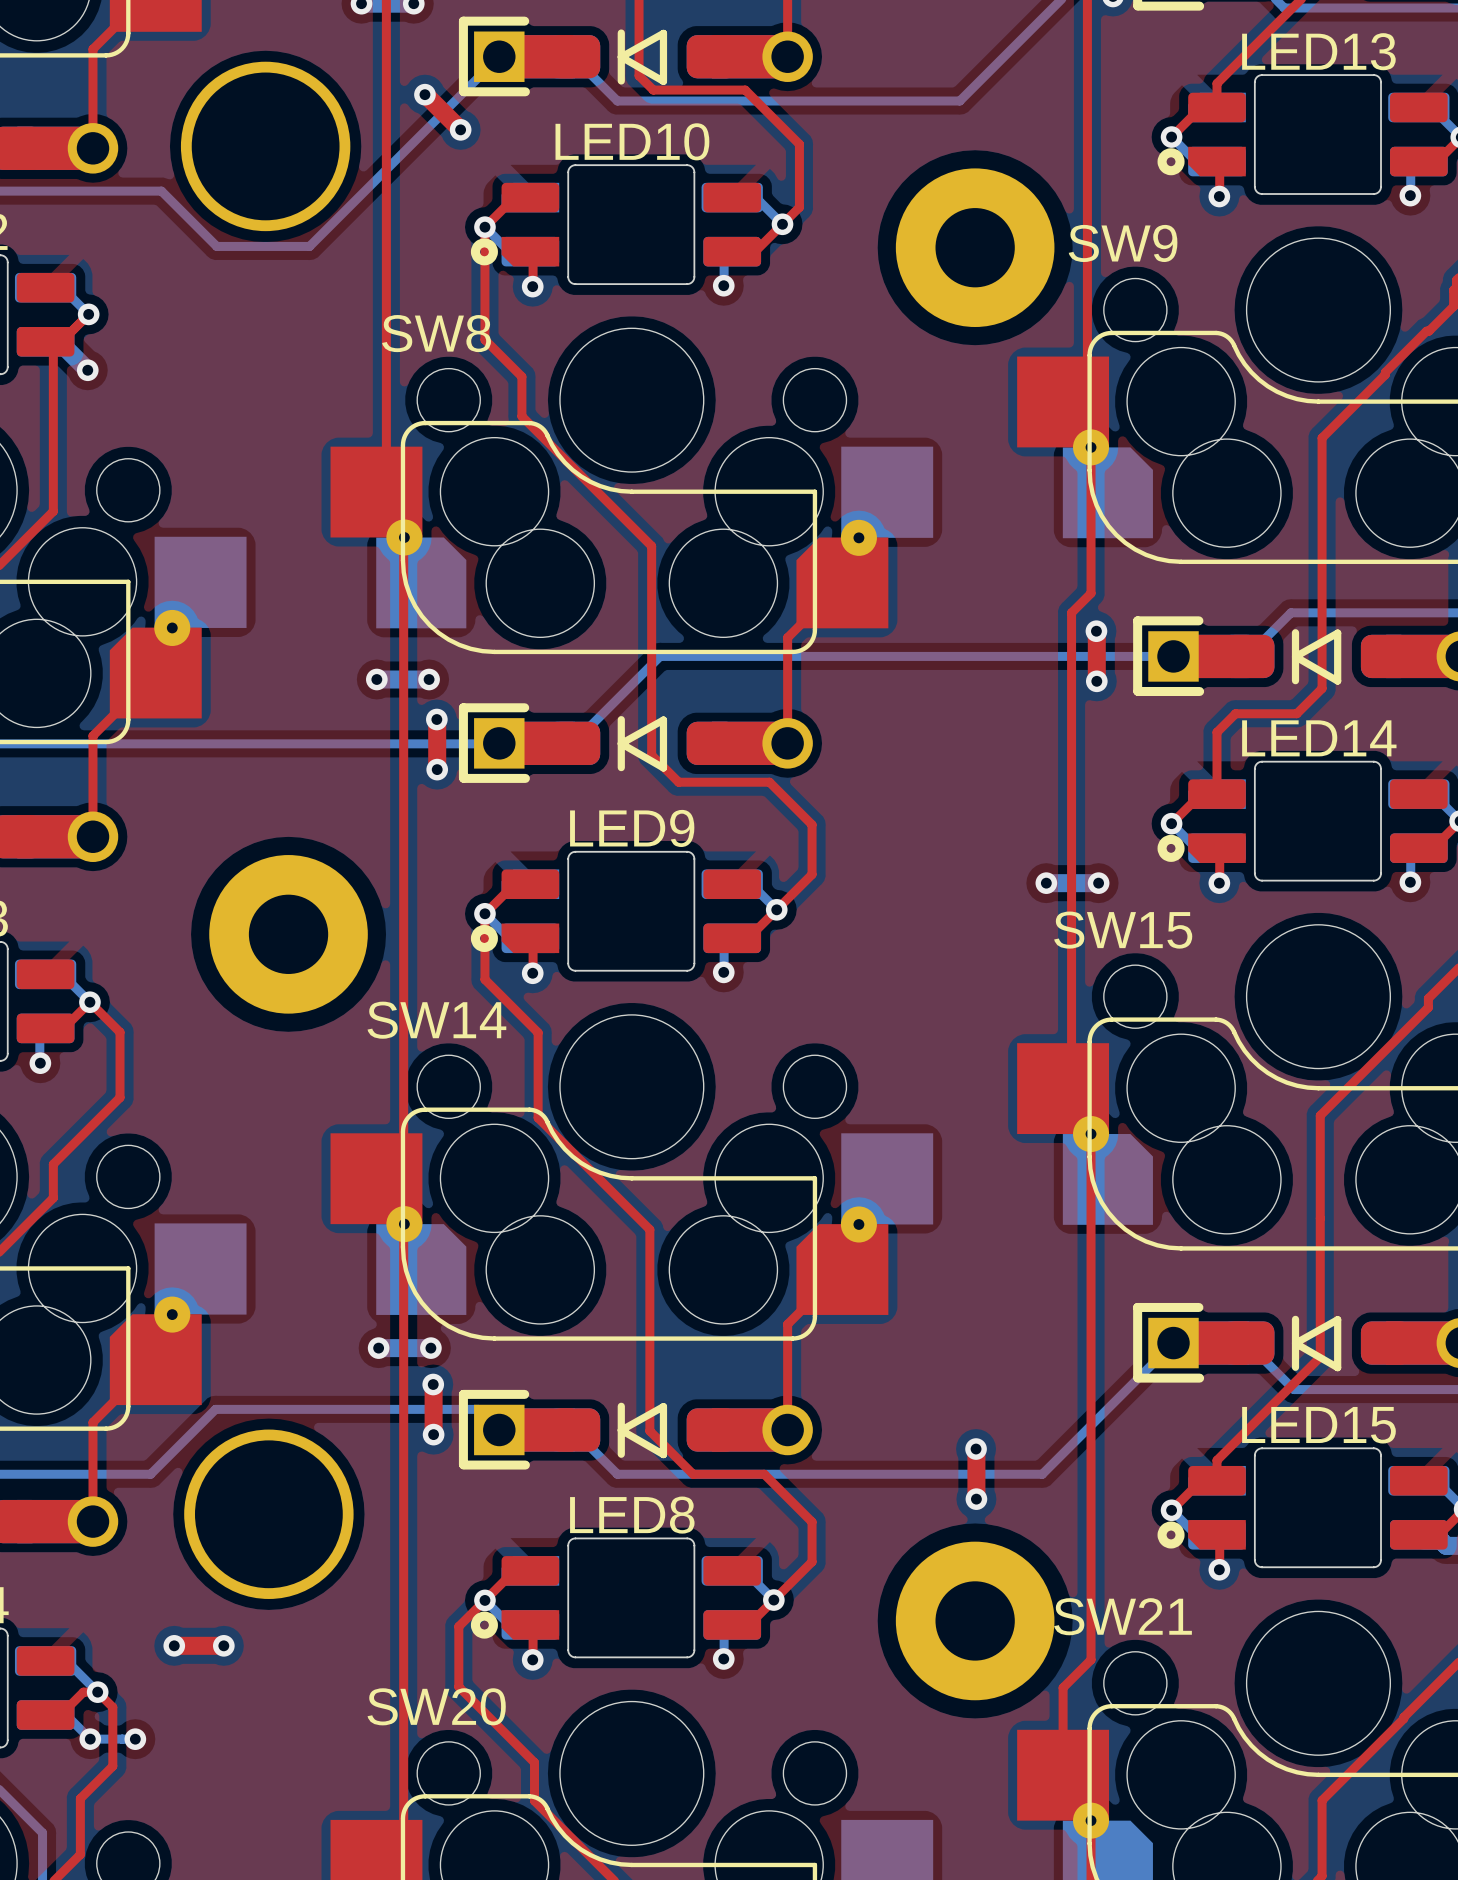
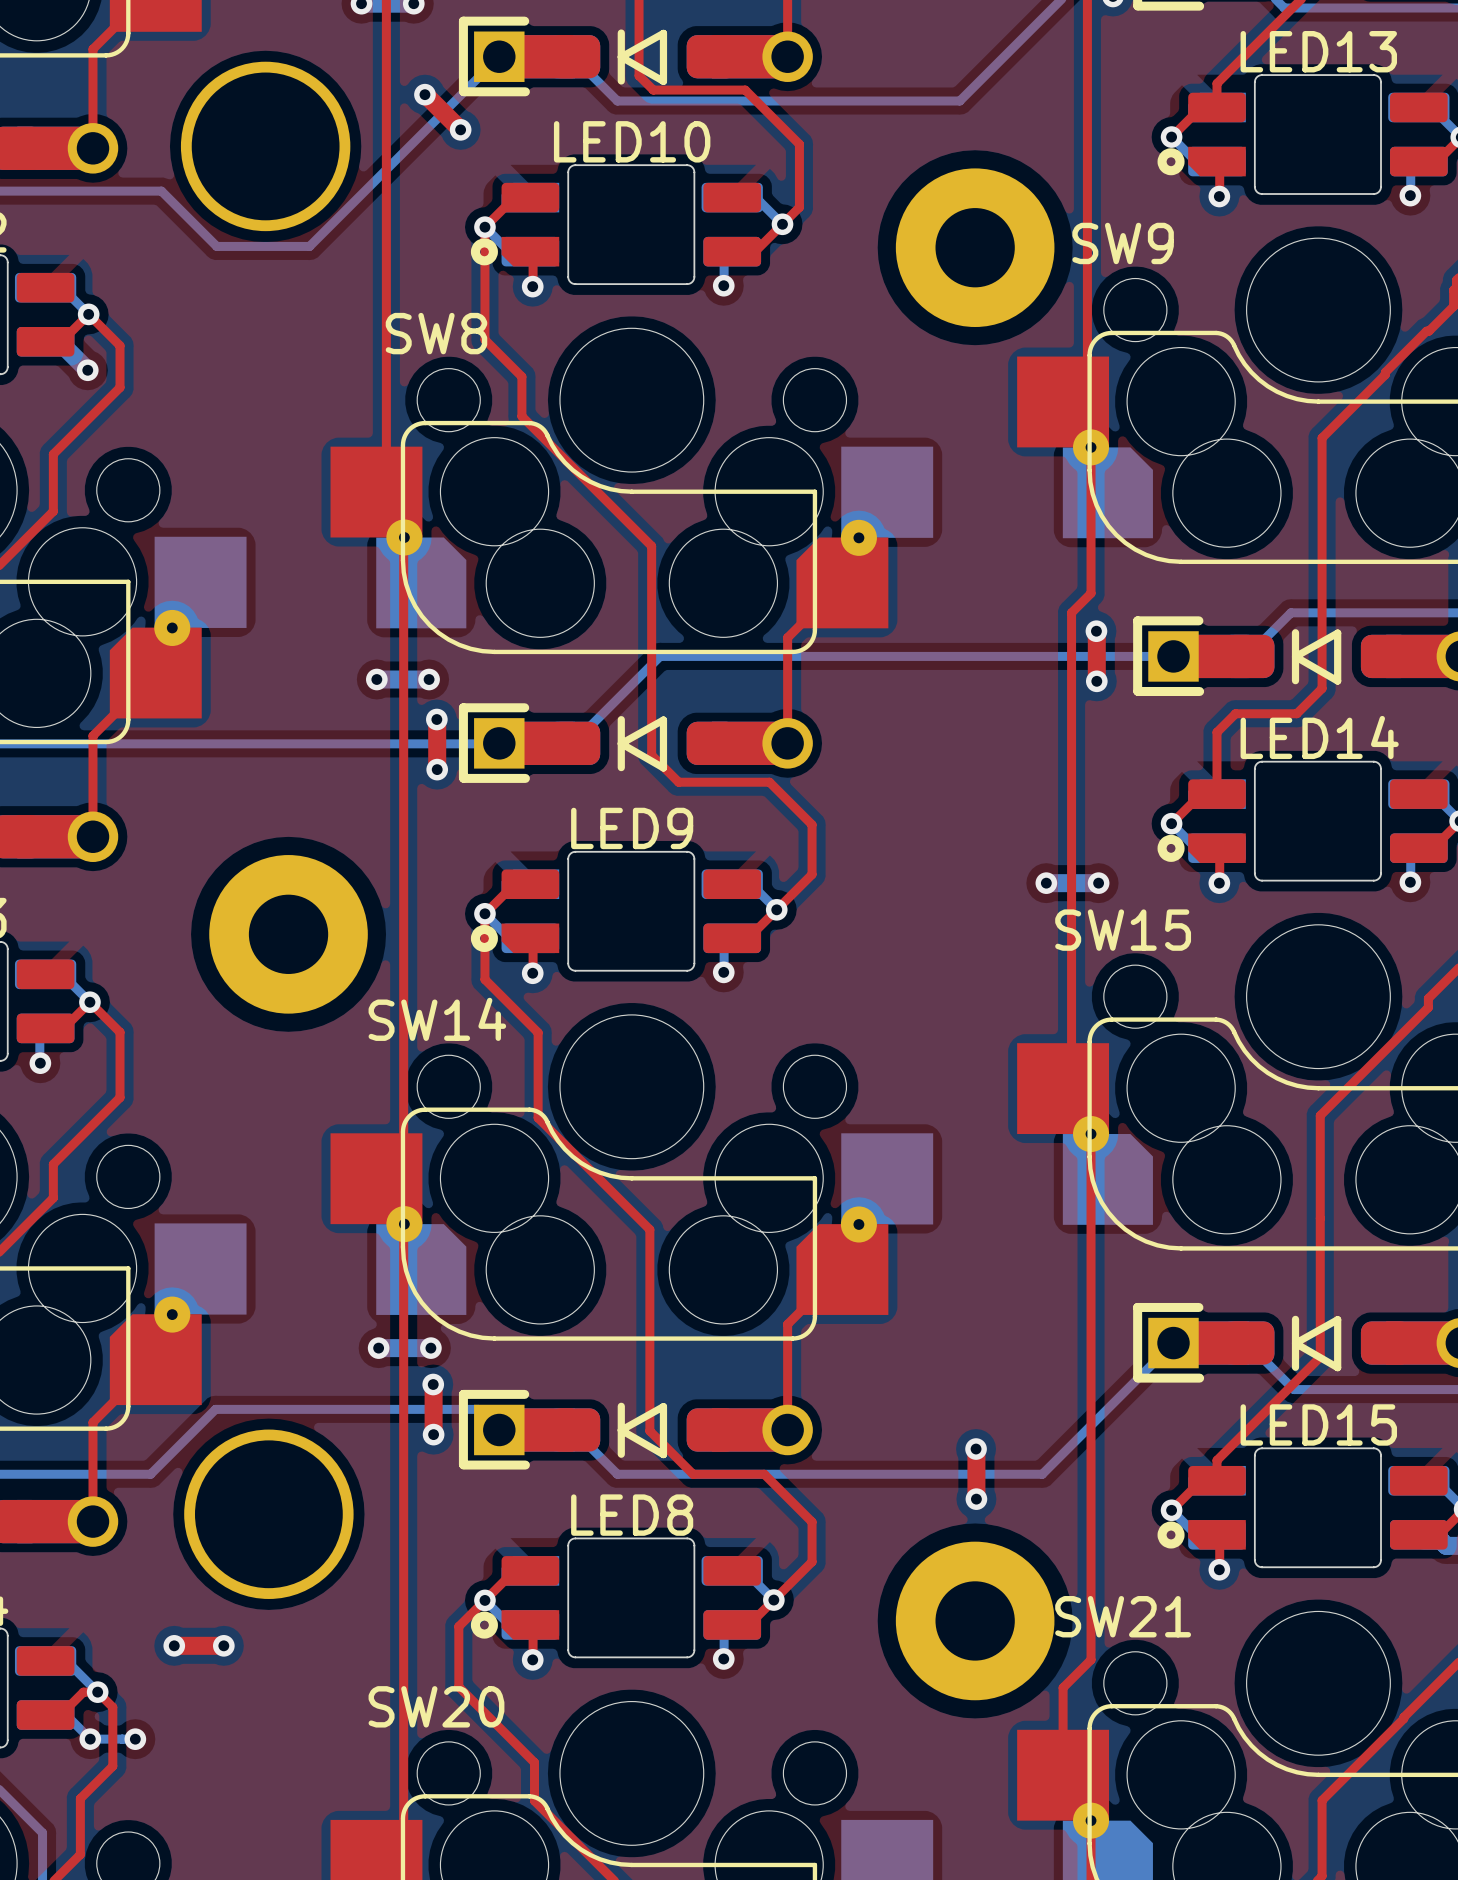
top track: (60, 343) (53, 349) (53, 454) -> (88, 314) (120, 345) (120, 387) (53, 454)

